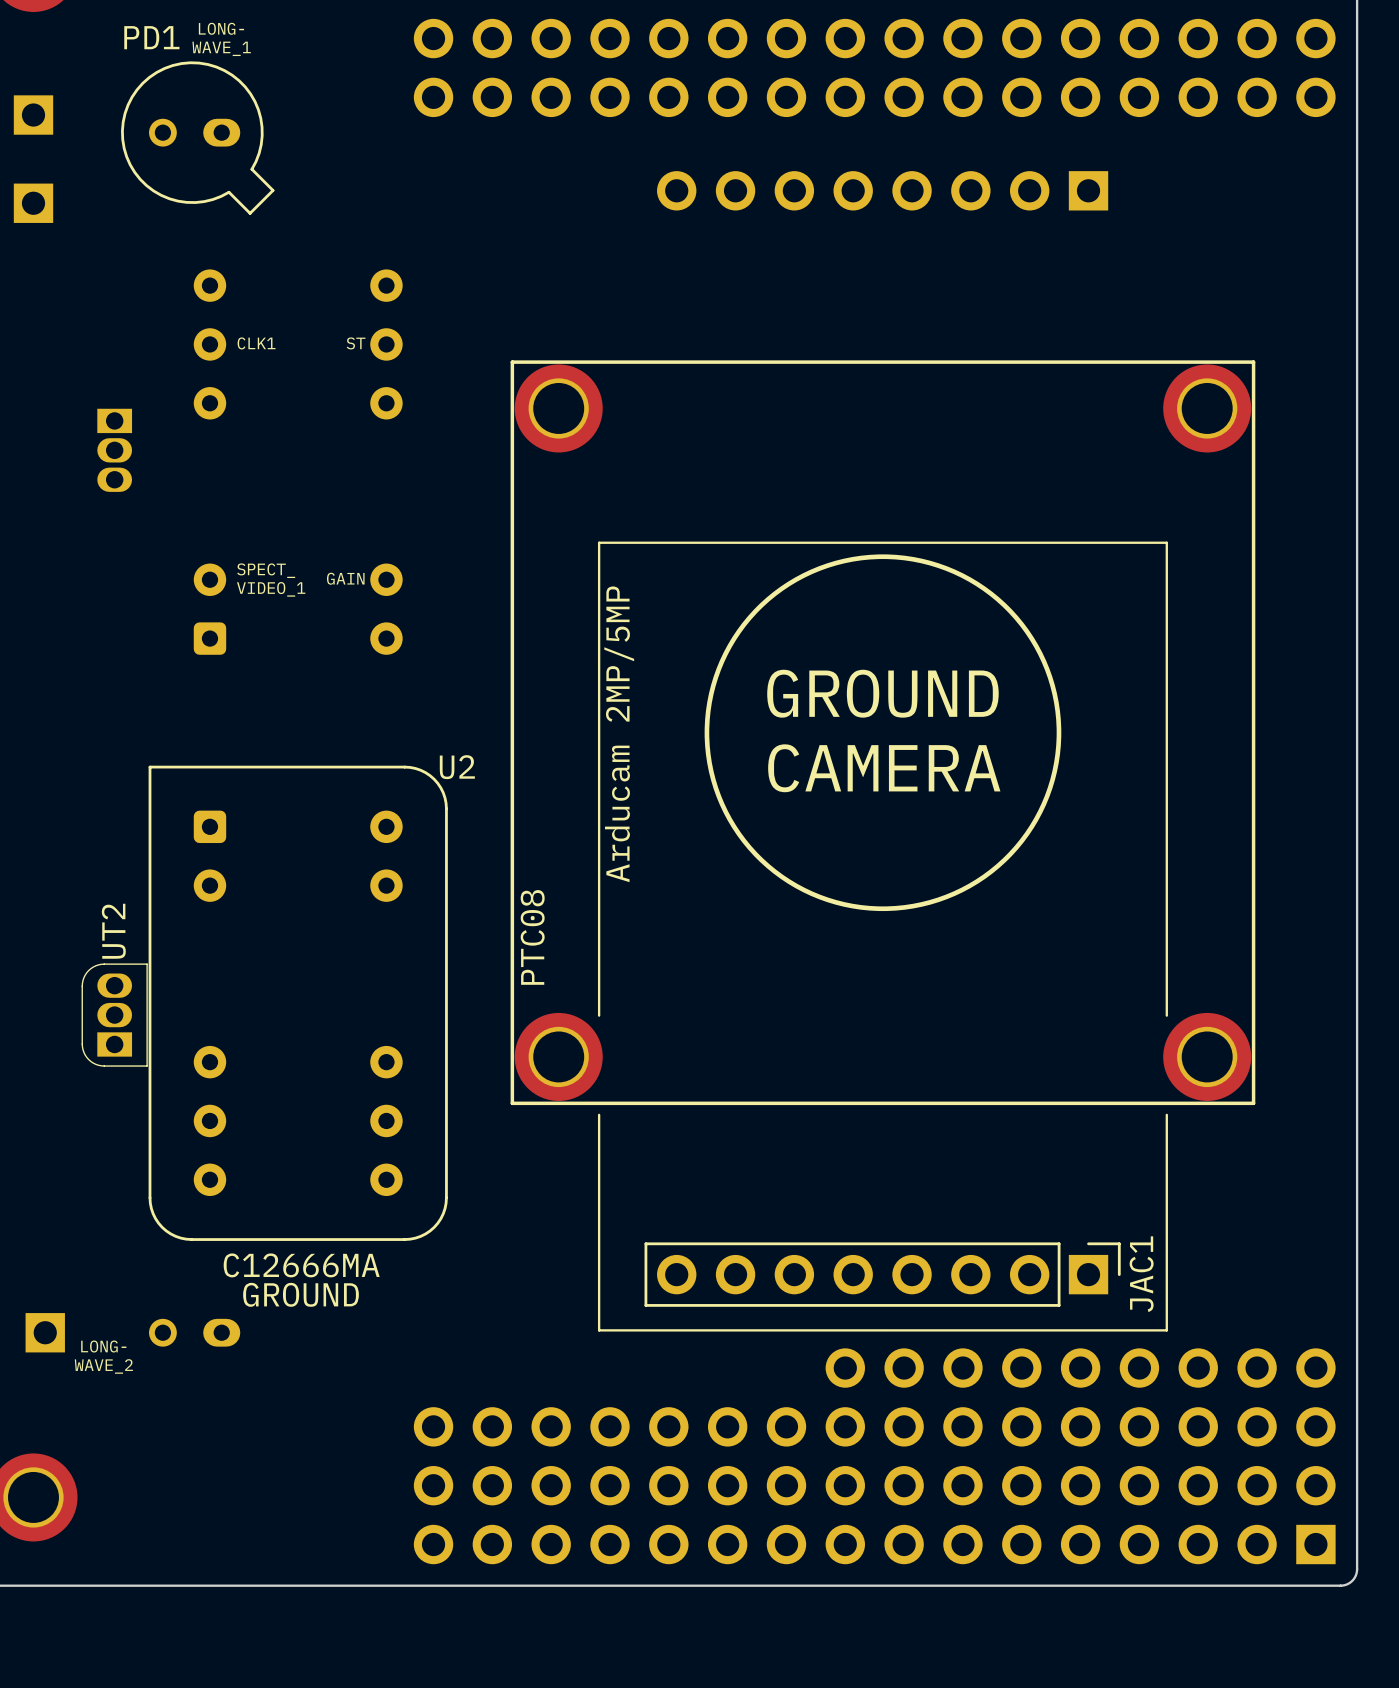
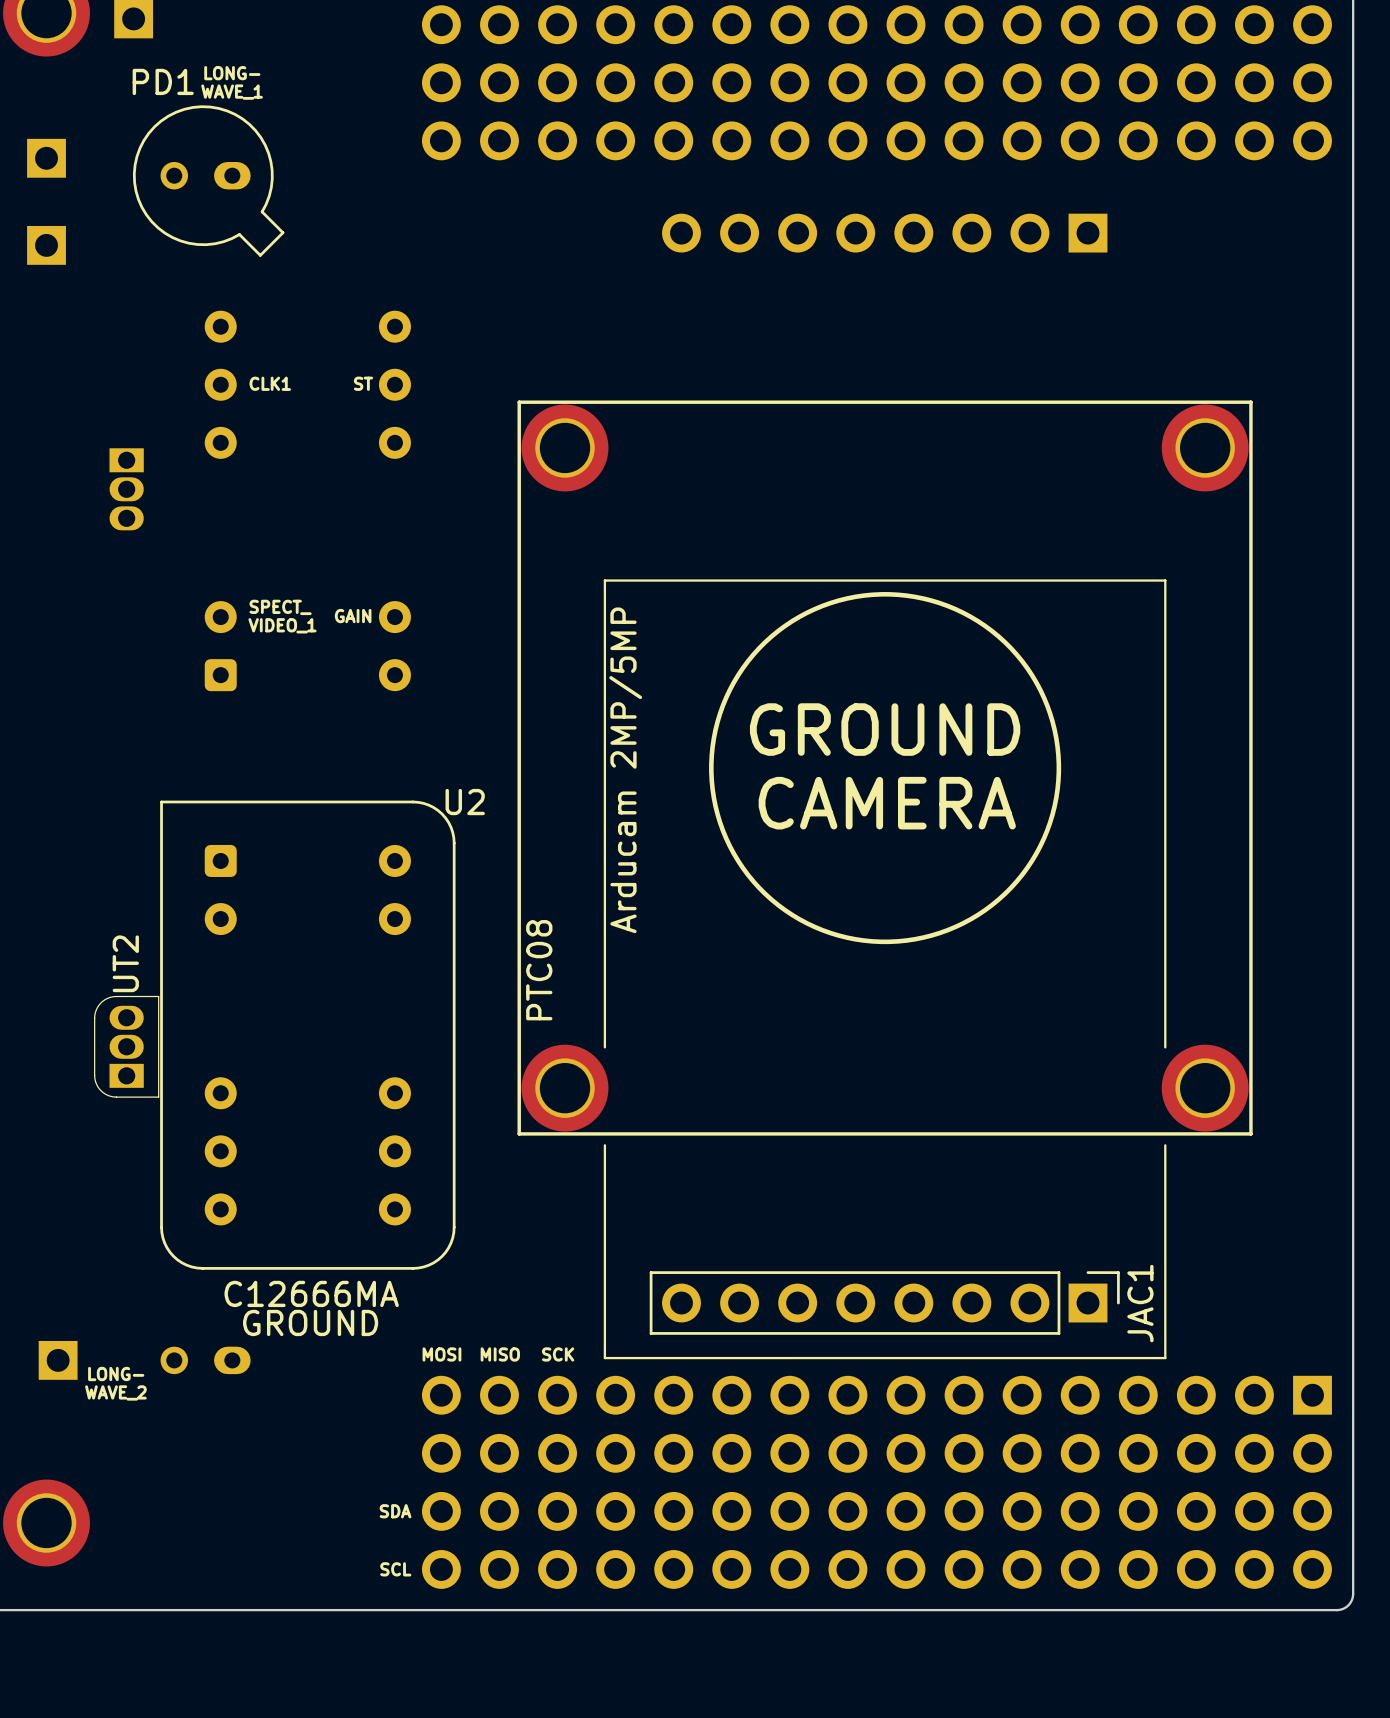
text: none -> MOSI (441, 1354)
text: none -> MISO (500, 1354)
text: none -> SCK (558, 1354)
part footprint: [413, 1348, 1336, 1565] -> [421, 1375, 1332, 1589]
text: none -> SDA (395, 1511)
text: none -> SCL (395, 1569)

